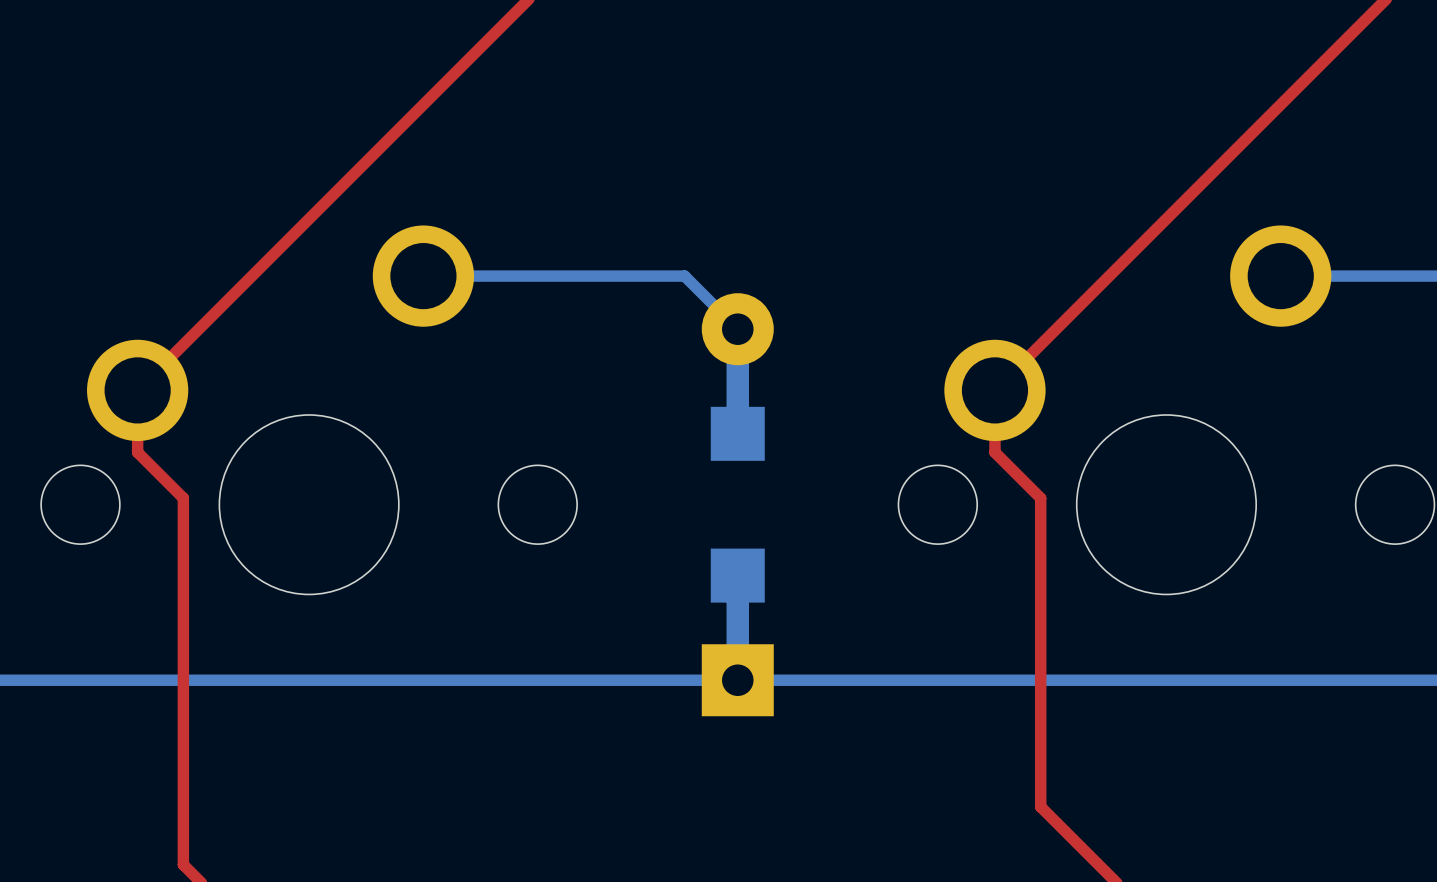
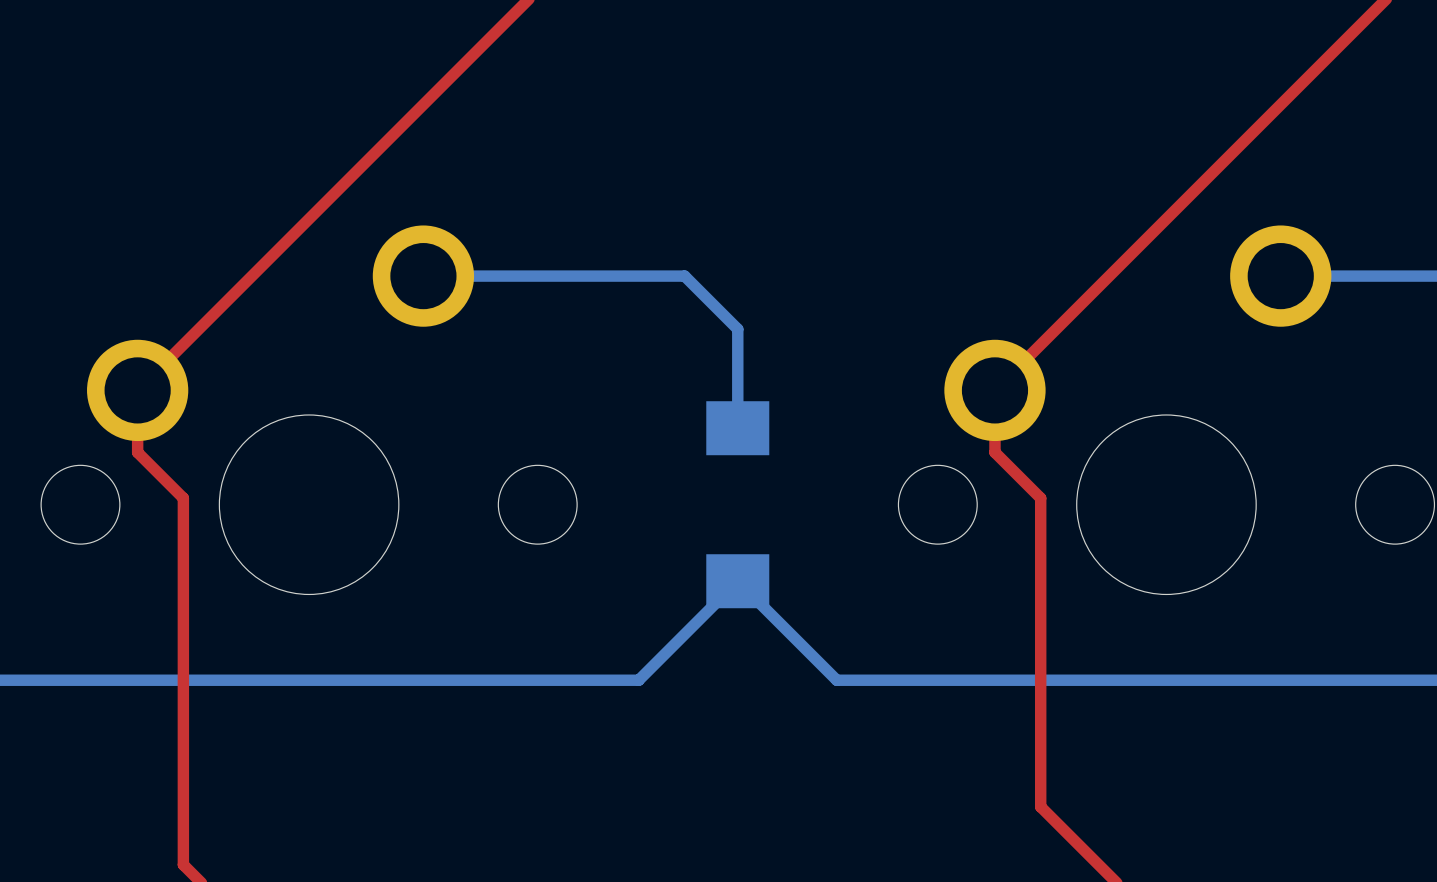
part footprint: [701, 293, 774, 717] -> [706, 401, 770, 609]
bottom track: none -> (737, 329) (737, 428)
bottom track: (638, 680) (836, 680) -> (638, 680) (737, 581) (836, 680)

